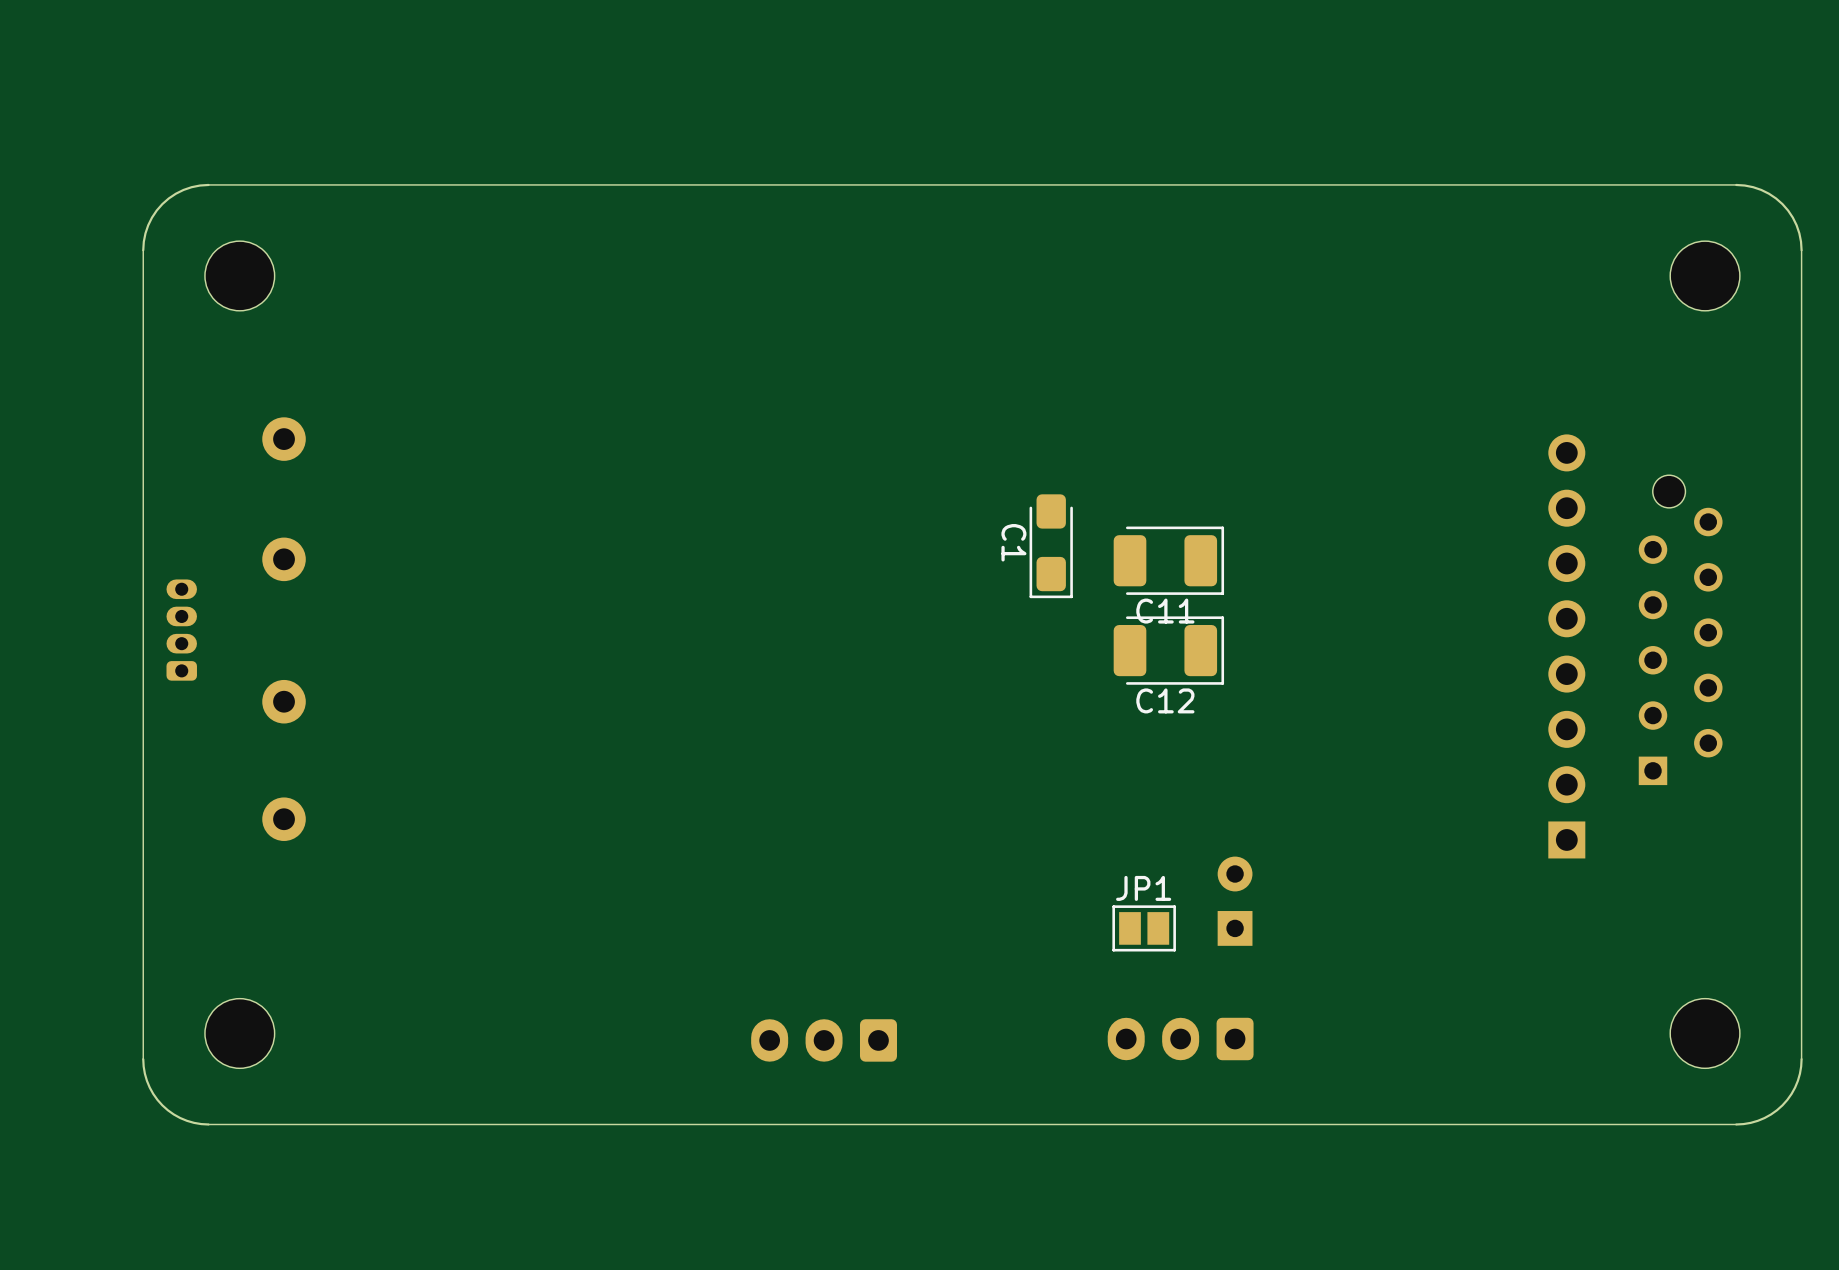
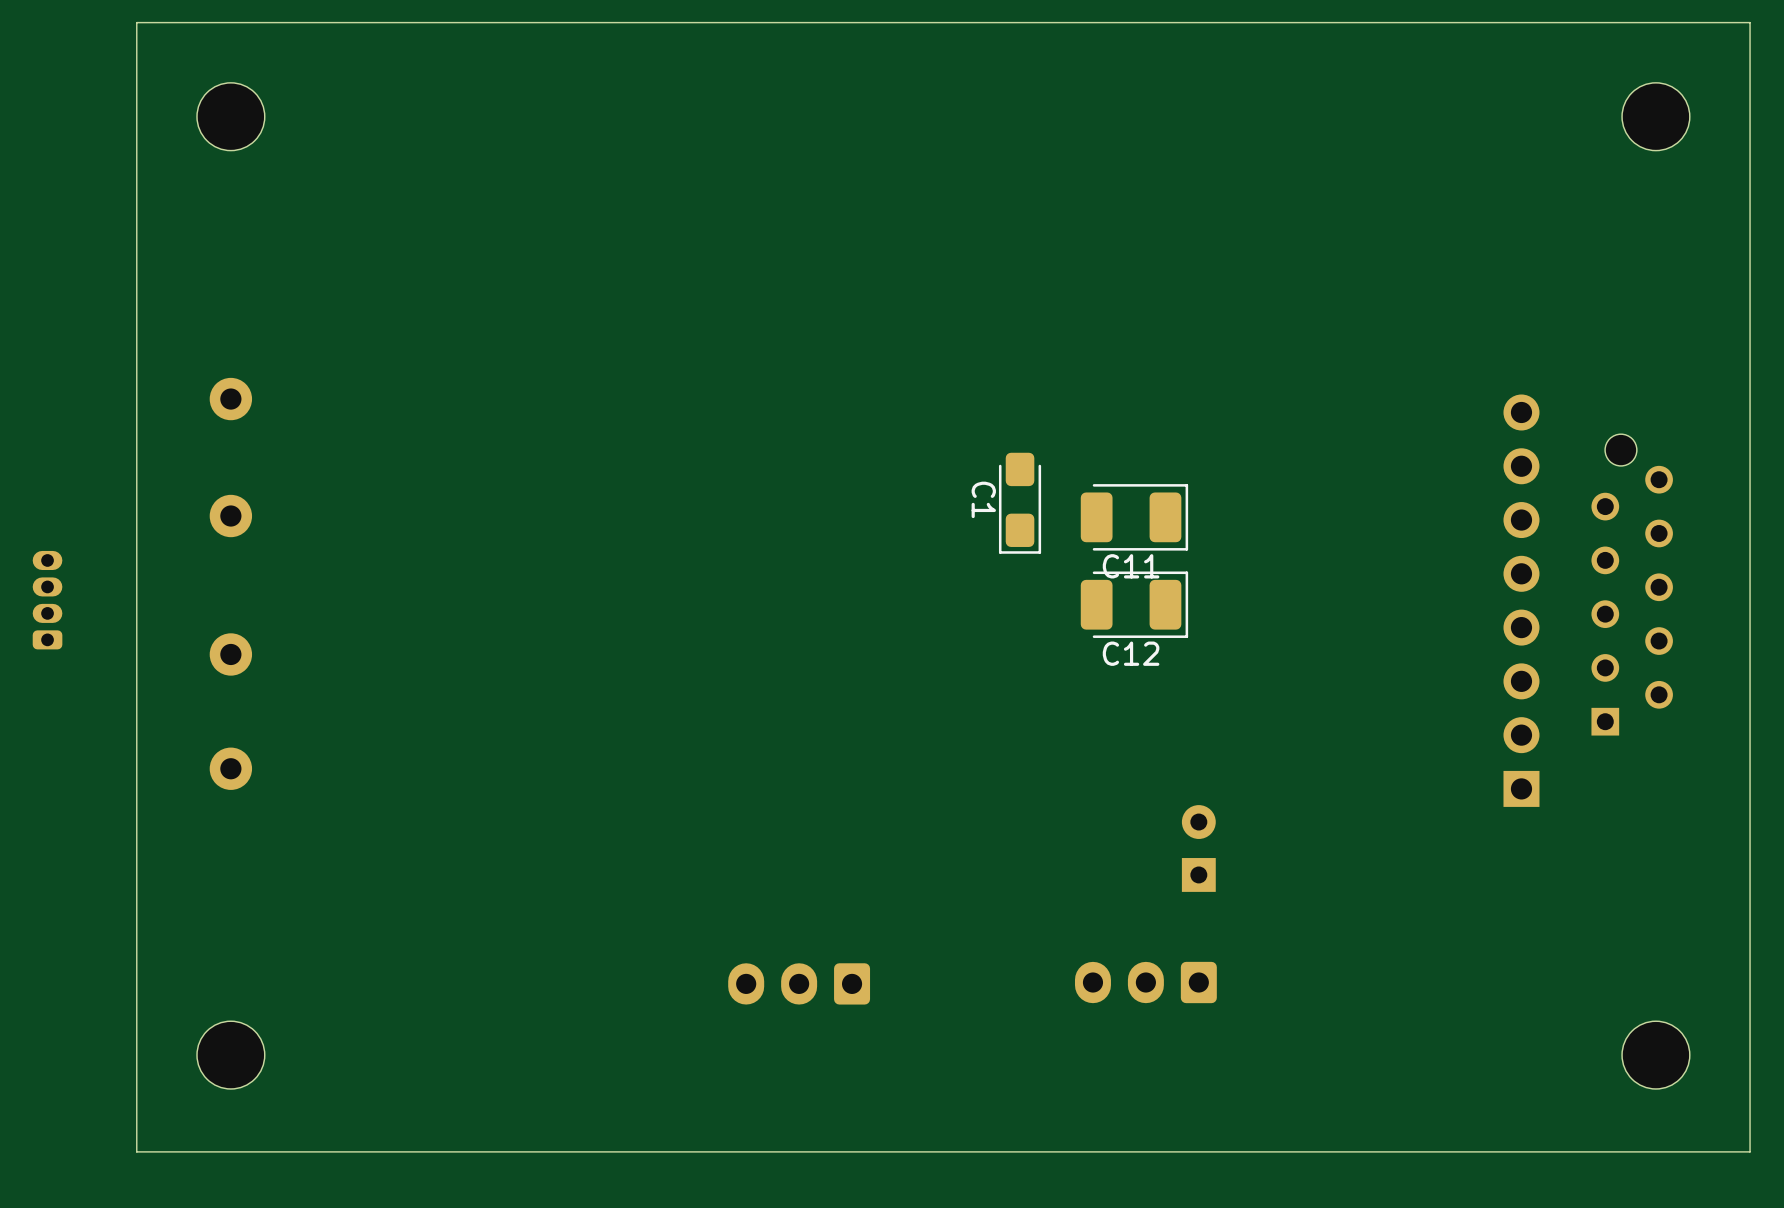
board edge: (1736, 184) (208, 184) (191, 187) (175, 193) (162, 204) (152, 217) (145, 233) (143, 250) (143, 1059) (144, 1073) (153, 1093) (162, 1105) (173, 1114) (186, 1120) (208, 1124) (1736, 1124) (1750, 1122) (1771, 1114) (1787, 1099) (1795, 1087) (1799, 1073) (1801, 1059) (1801, 250) (1796, 225) (1782, 204) (1761, 189) (1736, 184) -> (1750, 22) (1750, 1151) (136, 1151) (136, 22) (1750, 22)
part position: (239, 275) -> (230, 116)
part position: (1705, 275) -> (1655, 116)
part position: (284, 439) -> (230, 399)
part position: (284, 559) -> (230, 516)
part position: (181, 630) -> (47, 600)
part position: (284, 701) -> (230, 654)
part position: (284, 819) -> (230, 768)
JP1: (1144, 928) -> none
part position: (239, 1033) -> (230, 1055)
part position: (1705, 1033) -> (1655, 1055)

